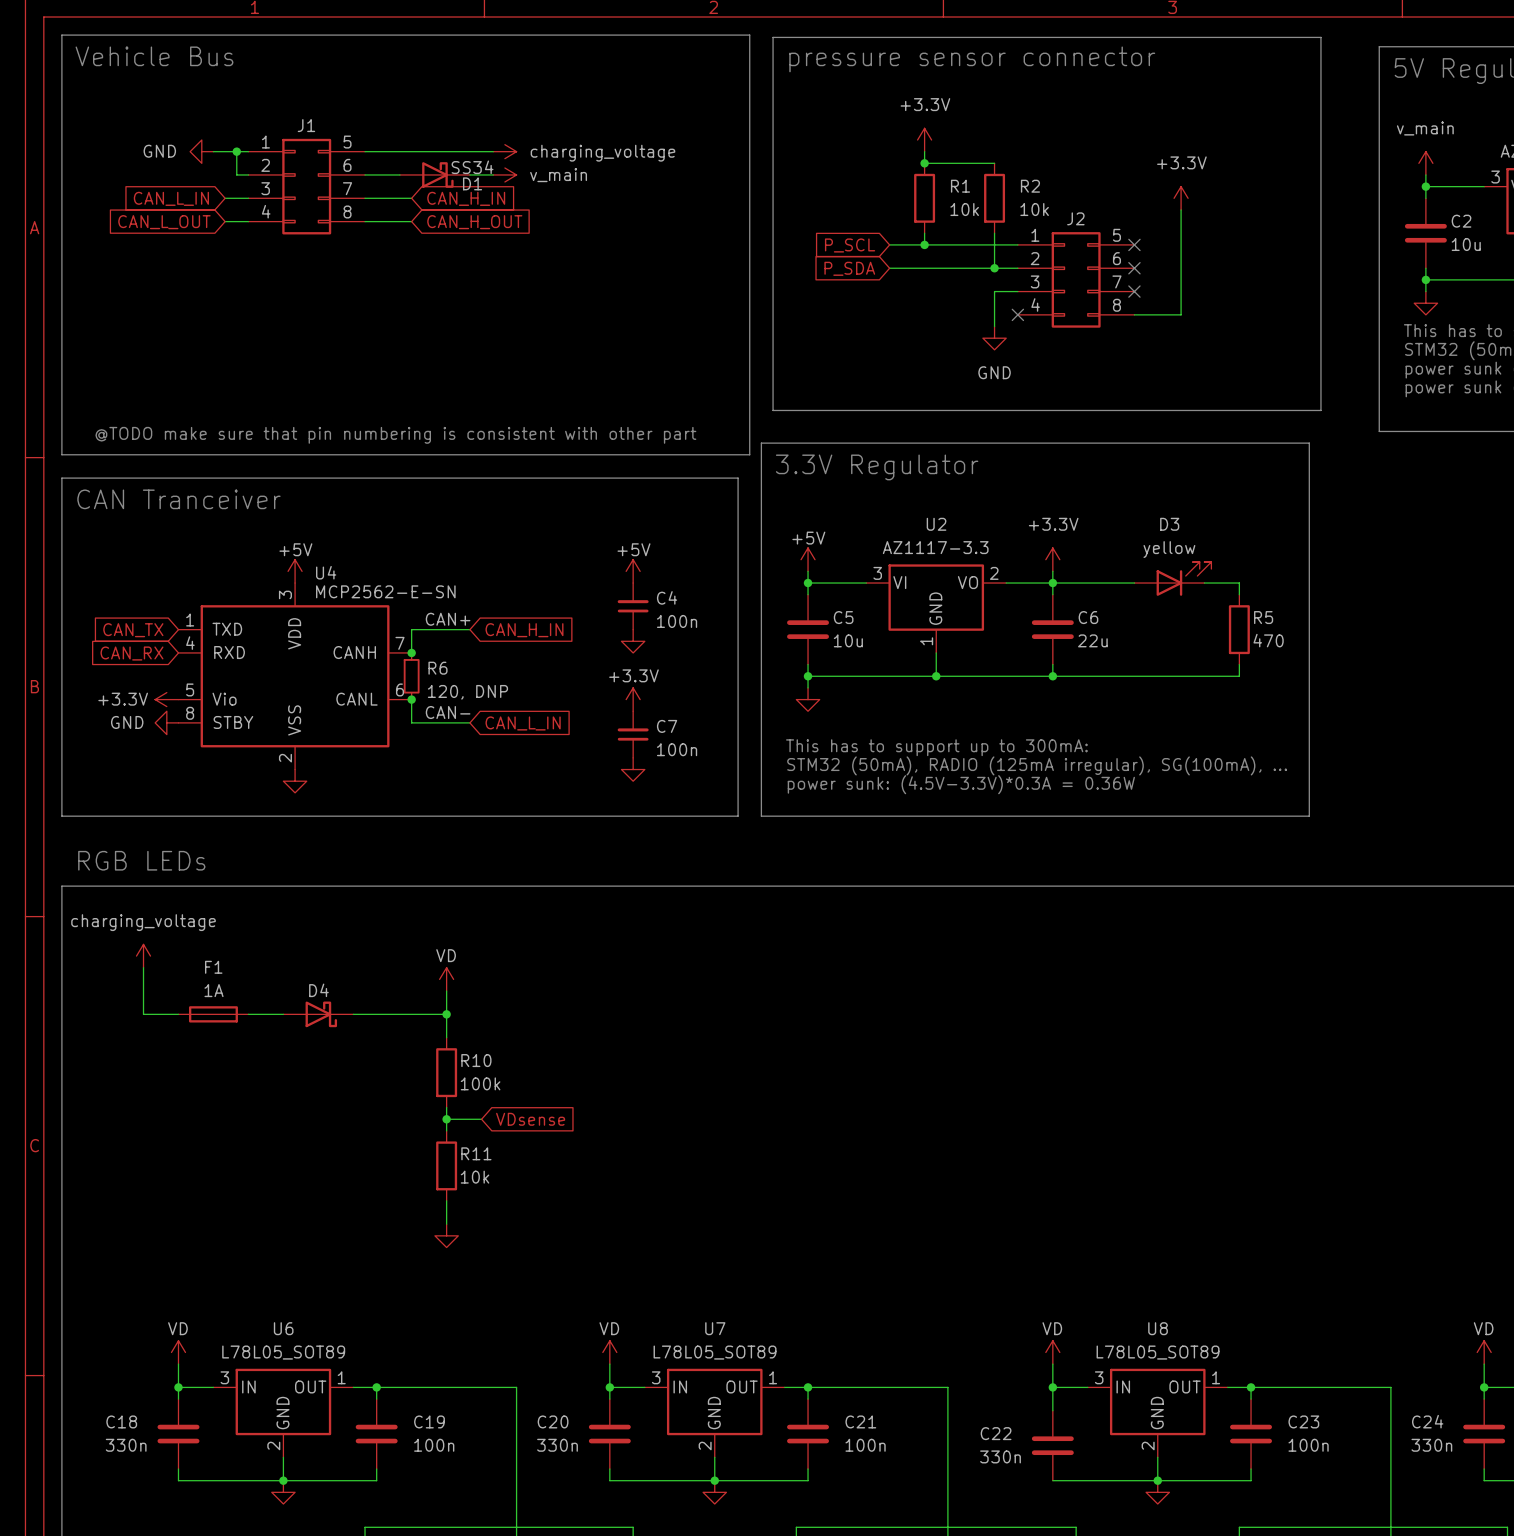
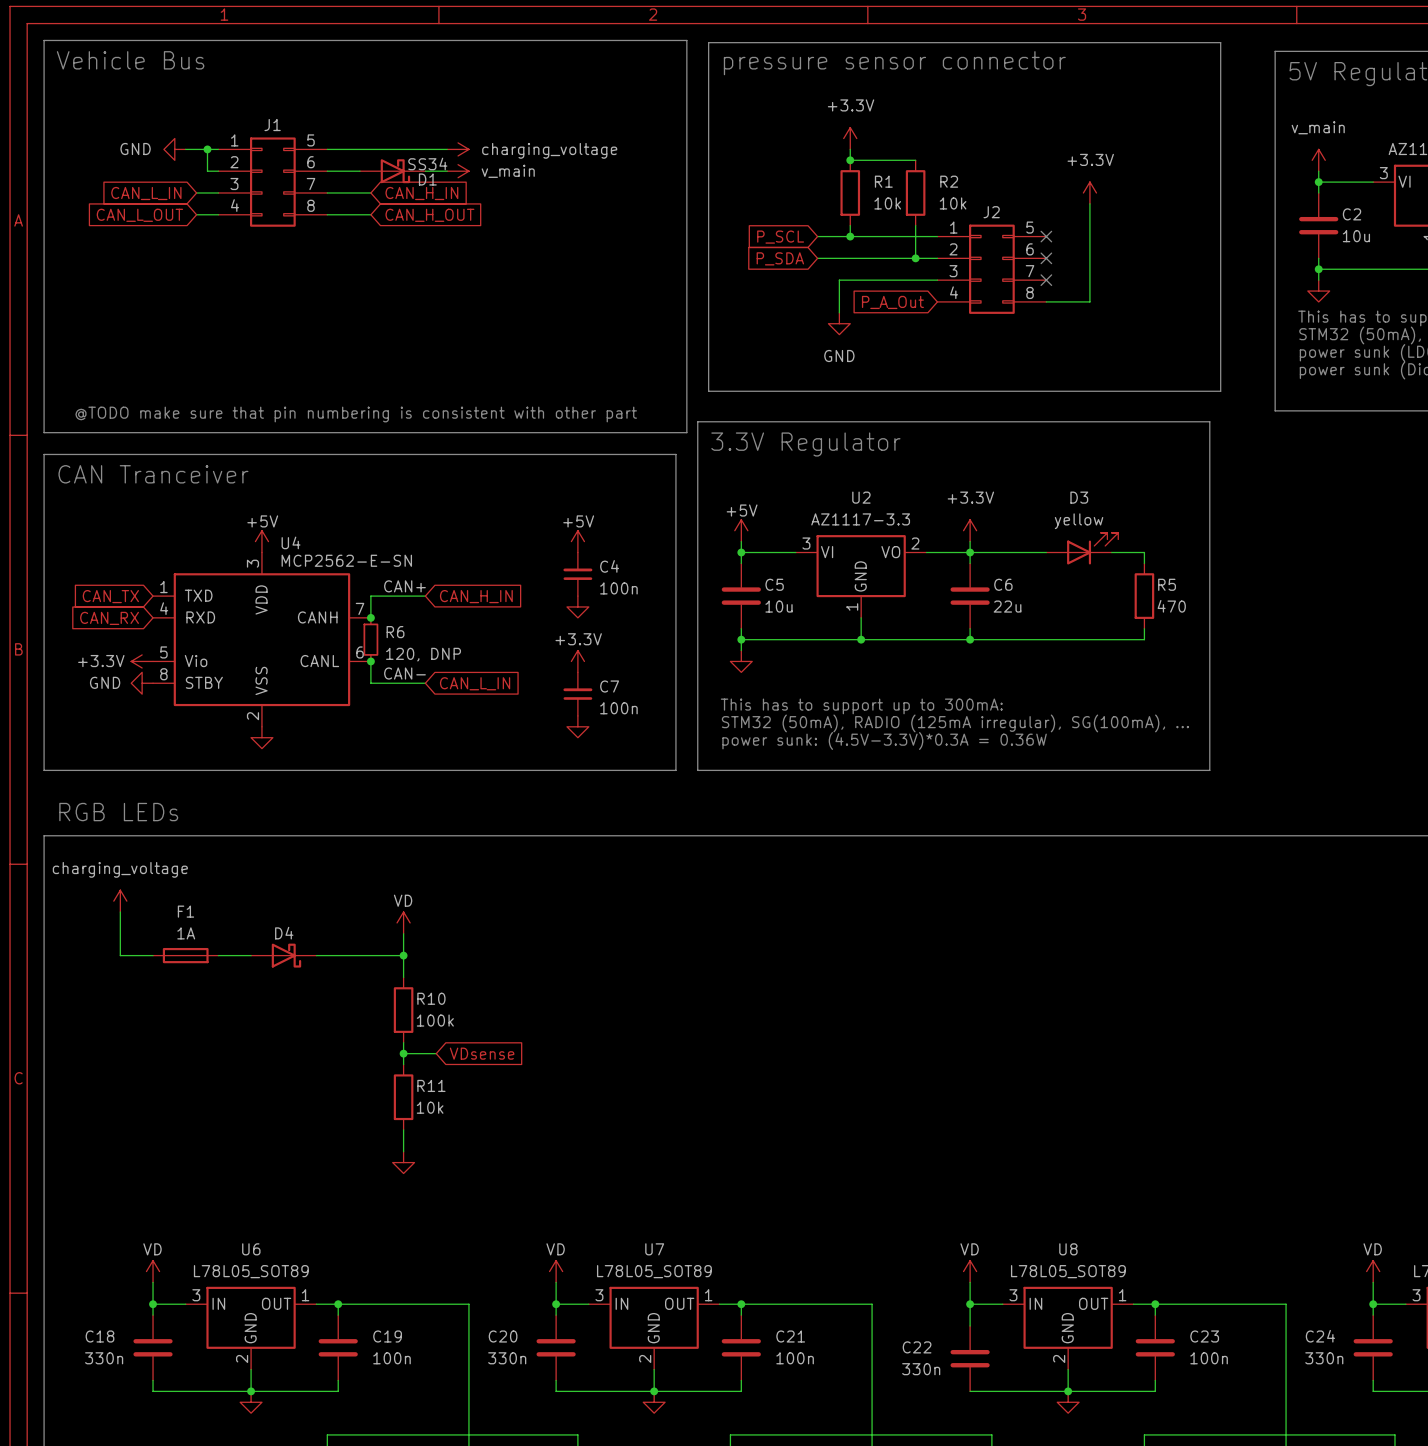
wire: (994, 291) (994, 326) -> (915, 280) (839, 280) (839, 312)
no-connect mark: (1017, 314) -> none
global label: none -> P_A_Out (892, 302)
power symbol position: GND (994, 338) -> GND (839, 323)

